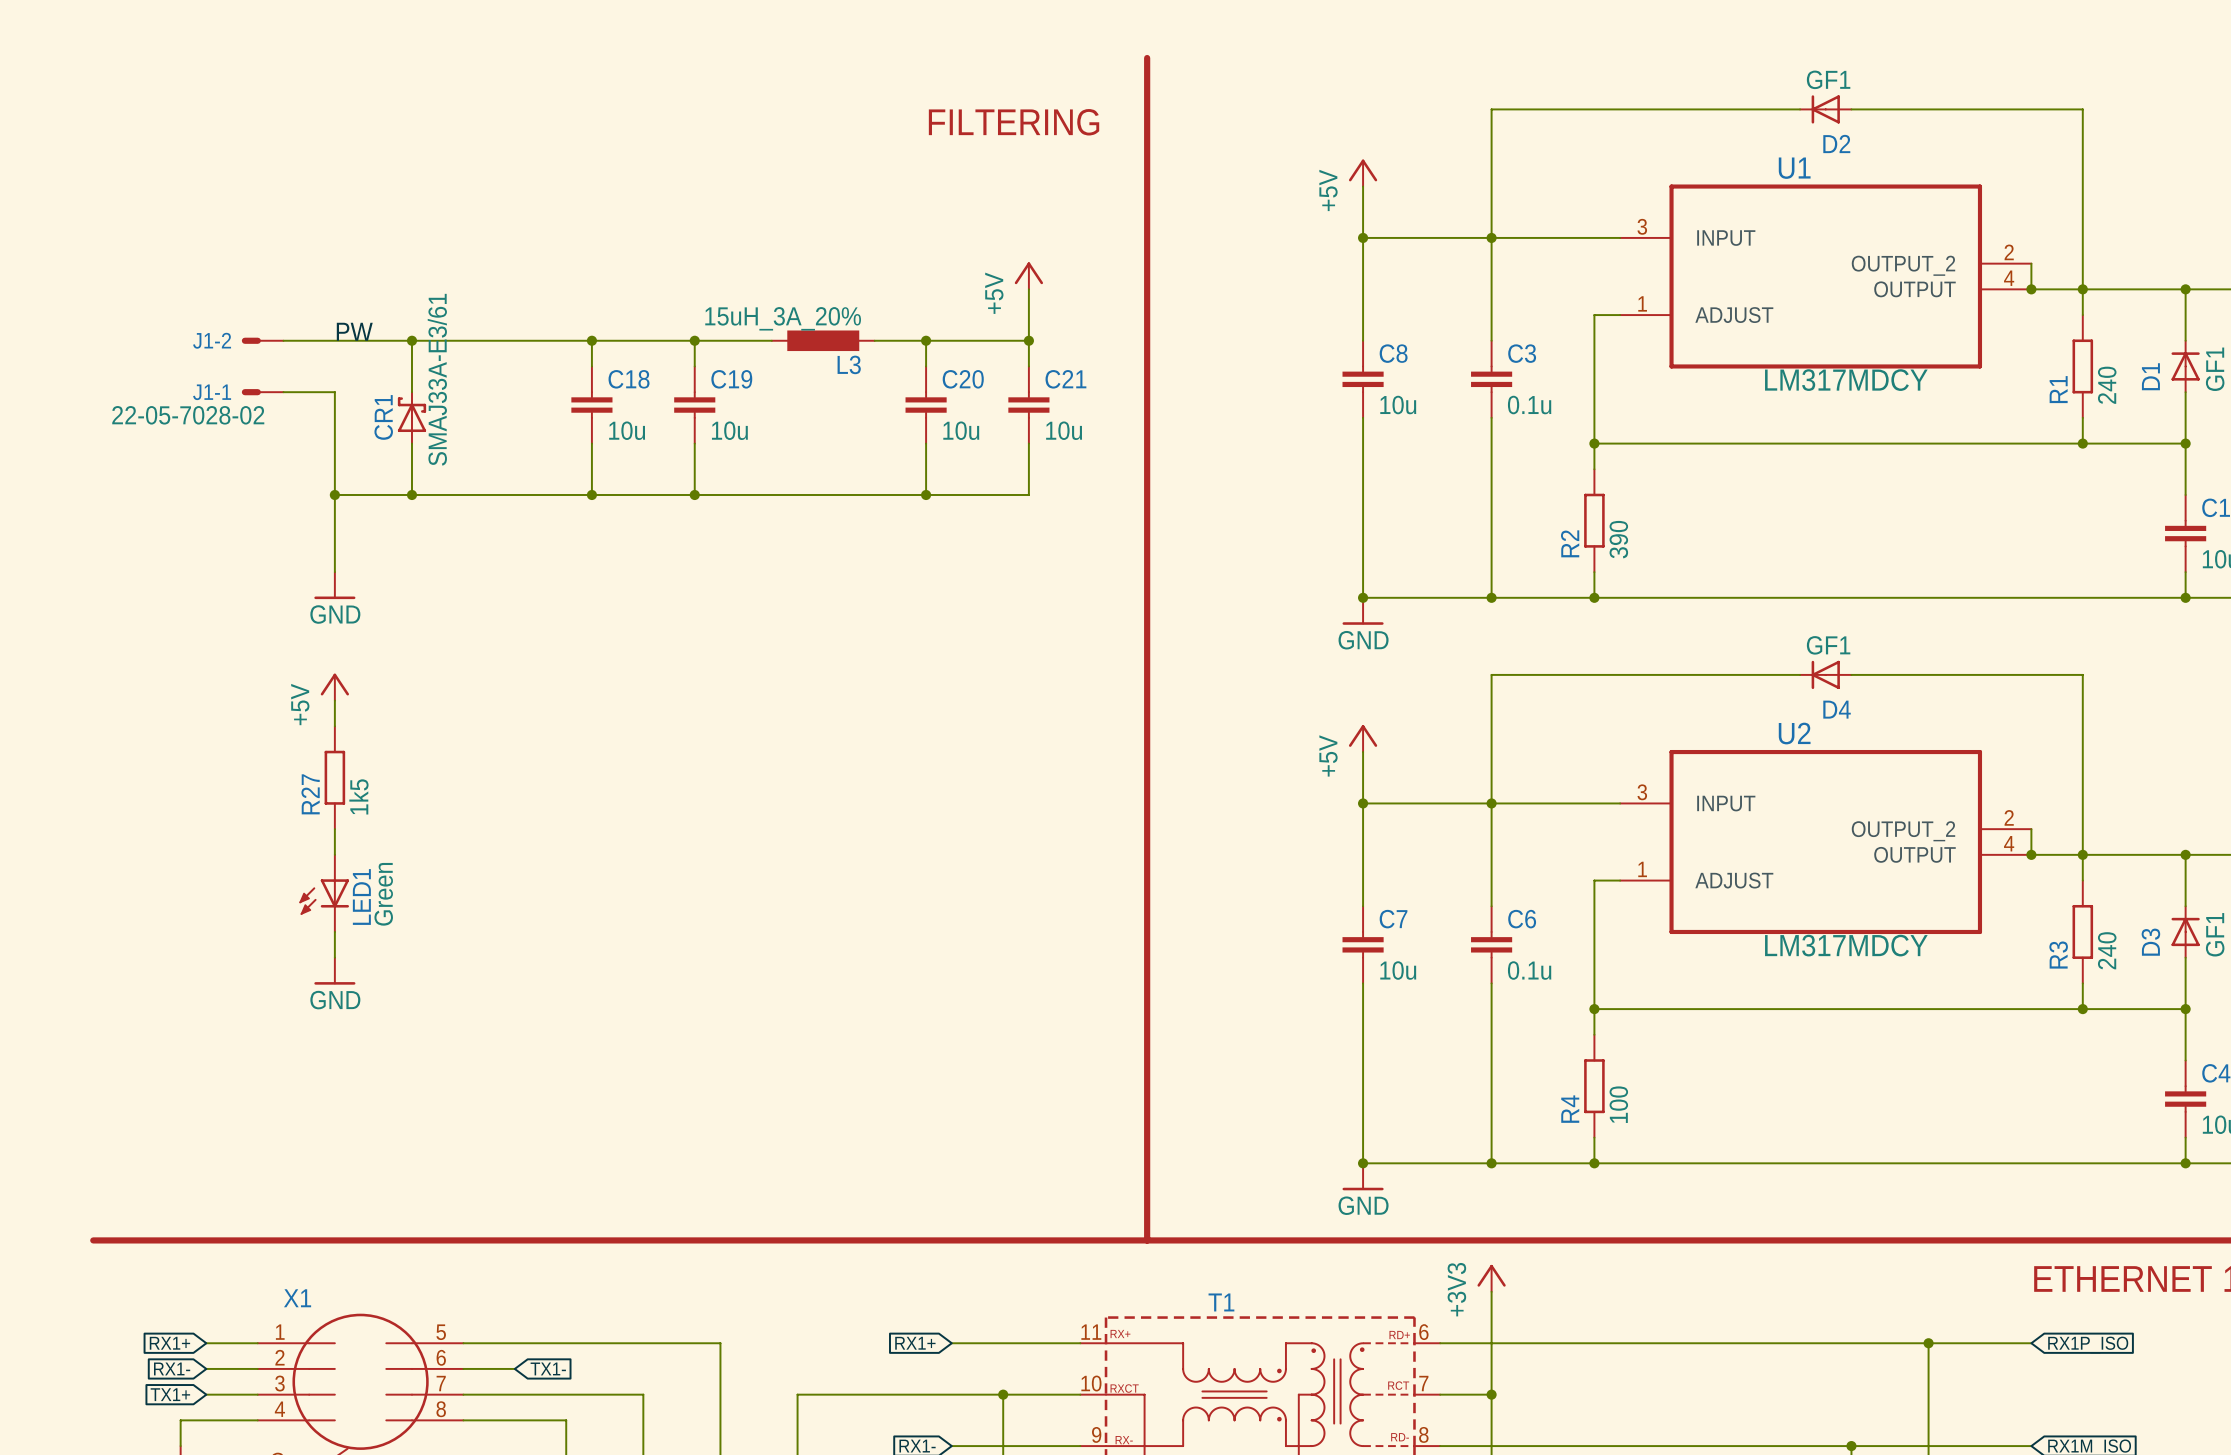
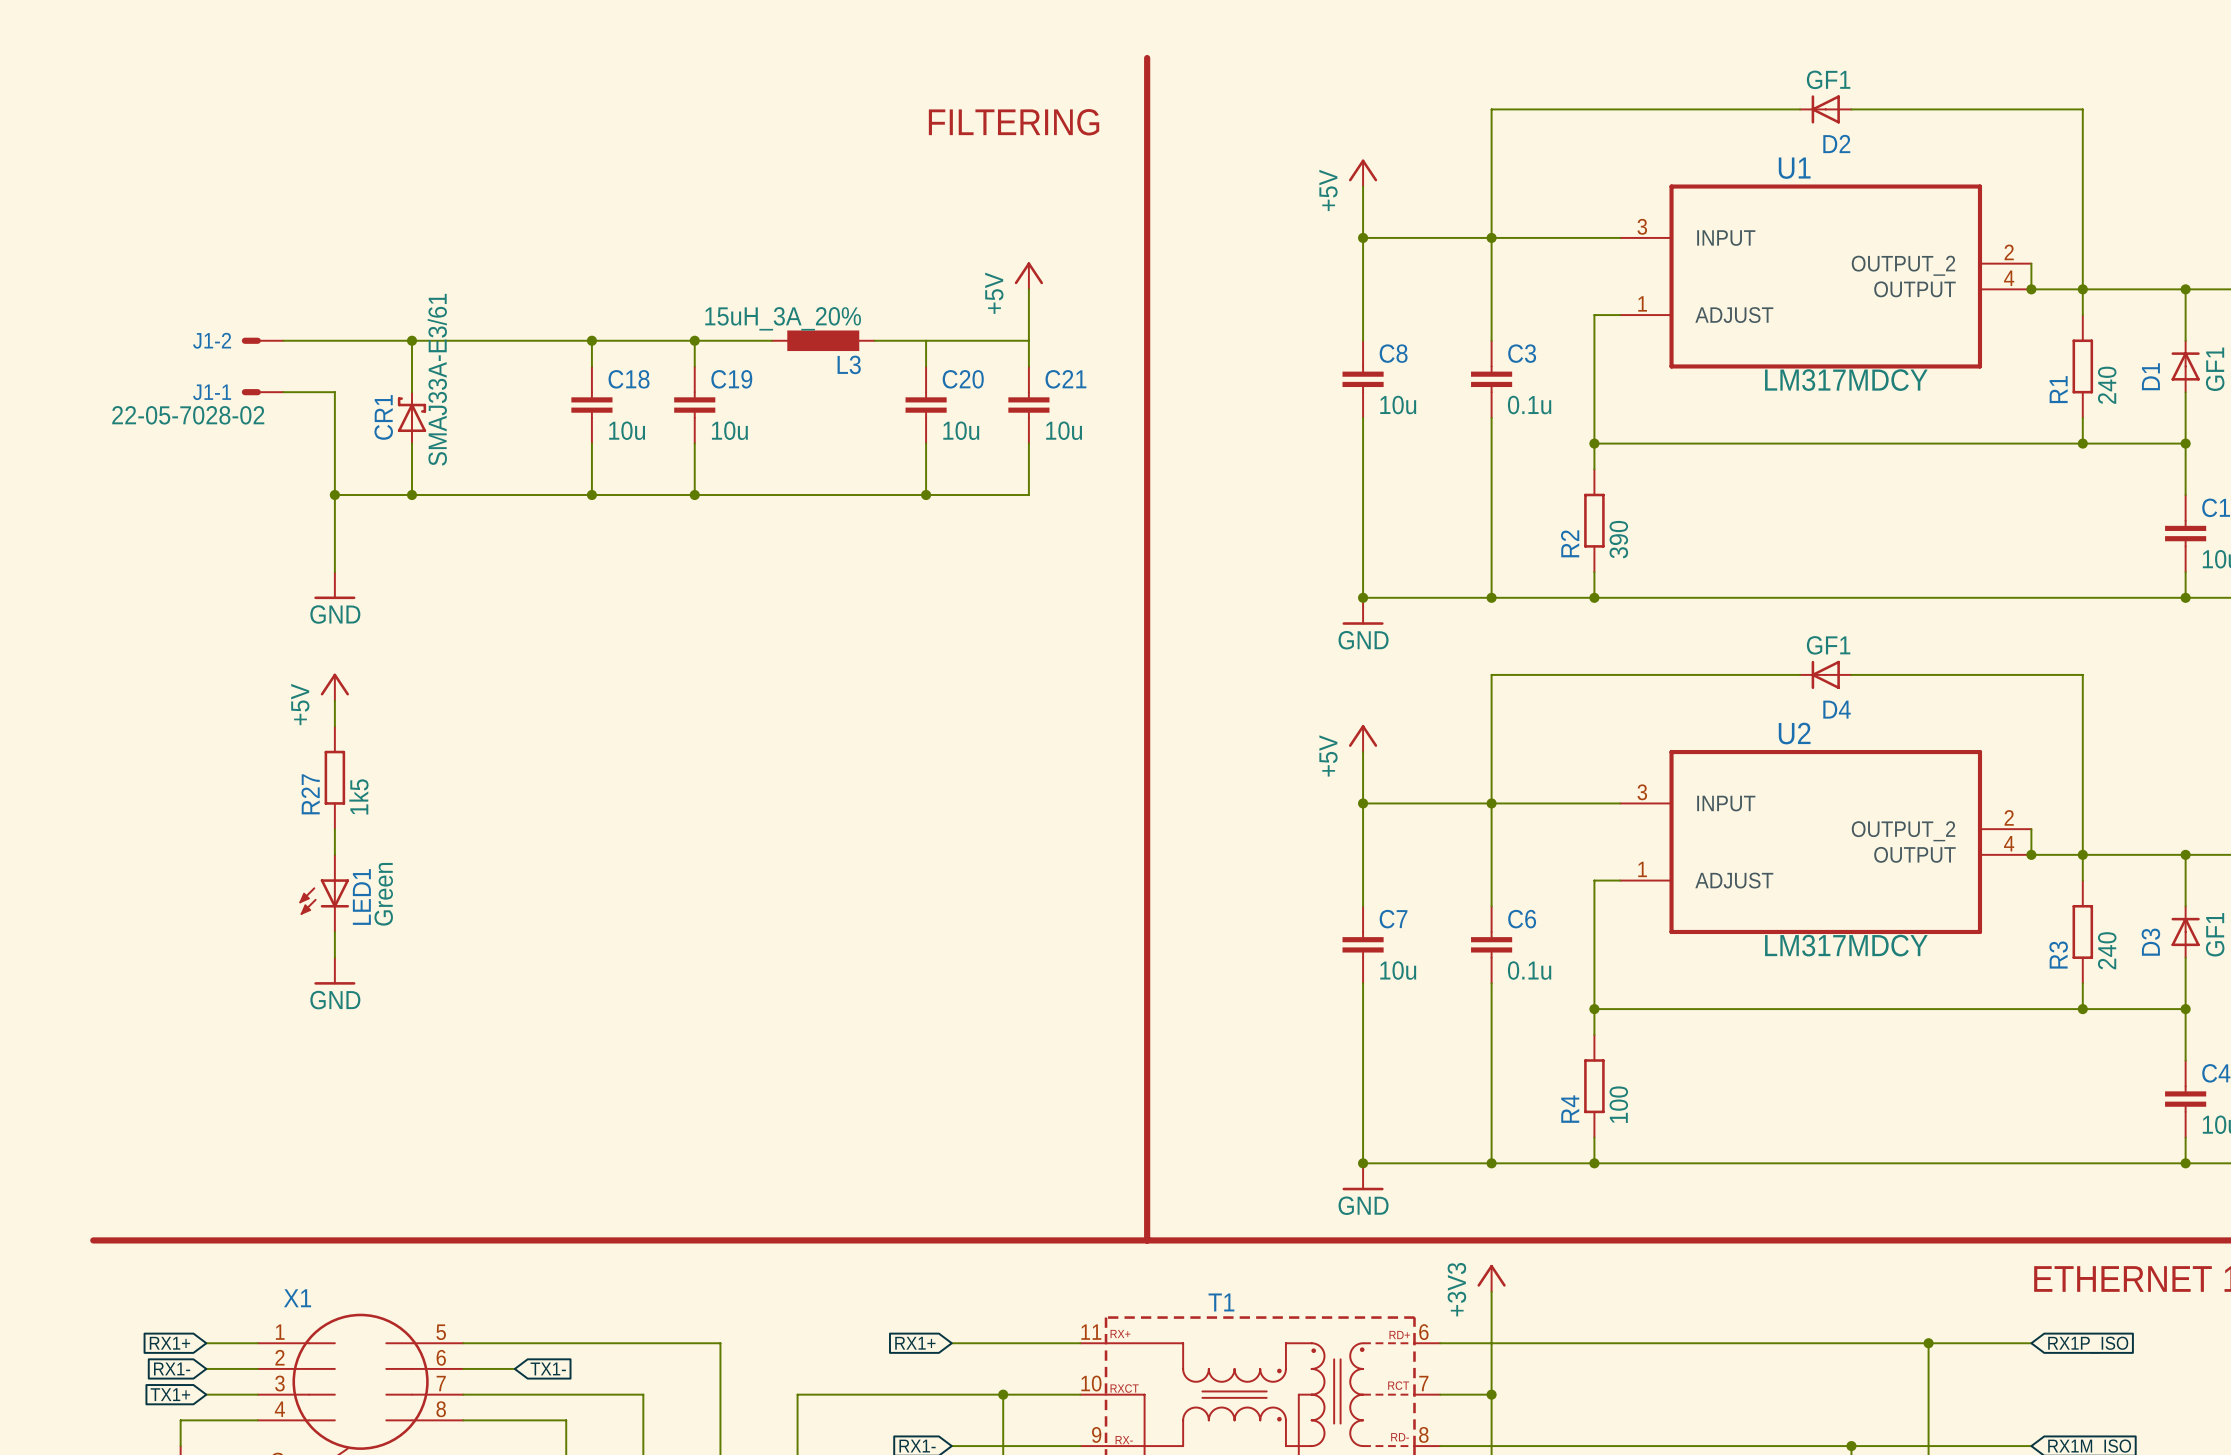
label: PW (354, 331) -> none
junction: (926, 340) -> none
junction: (1028, 340) -> none

